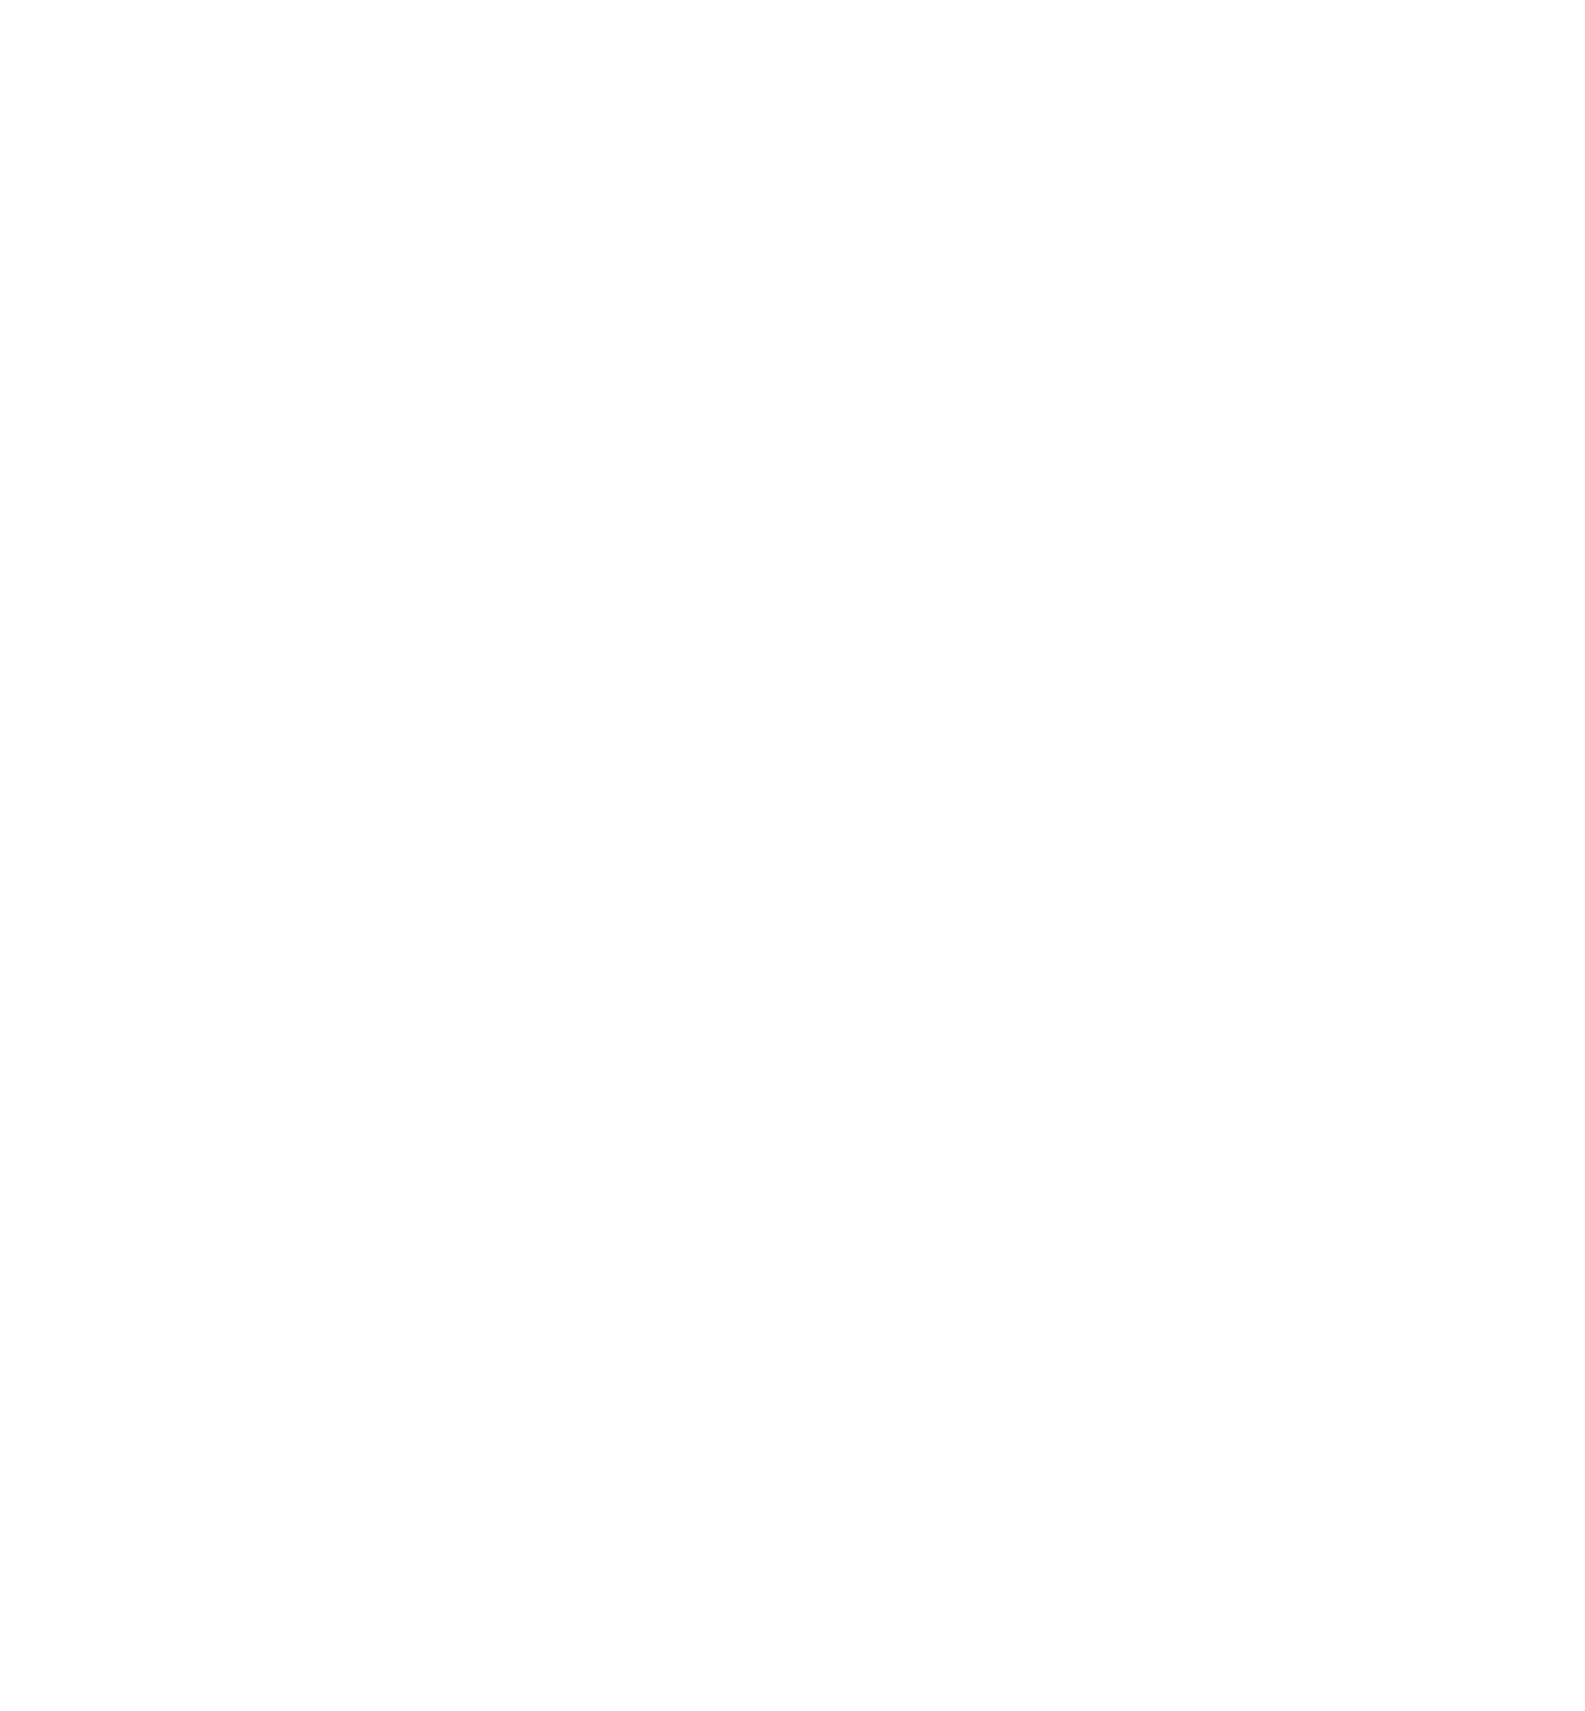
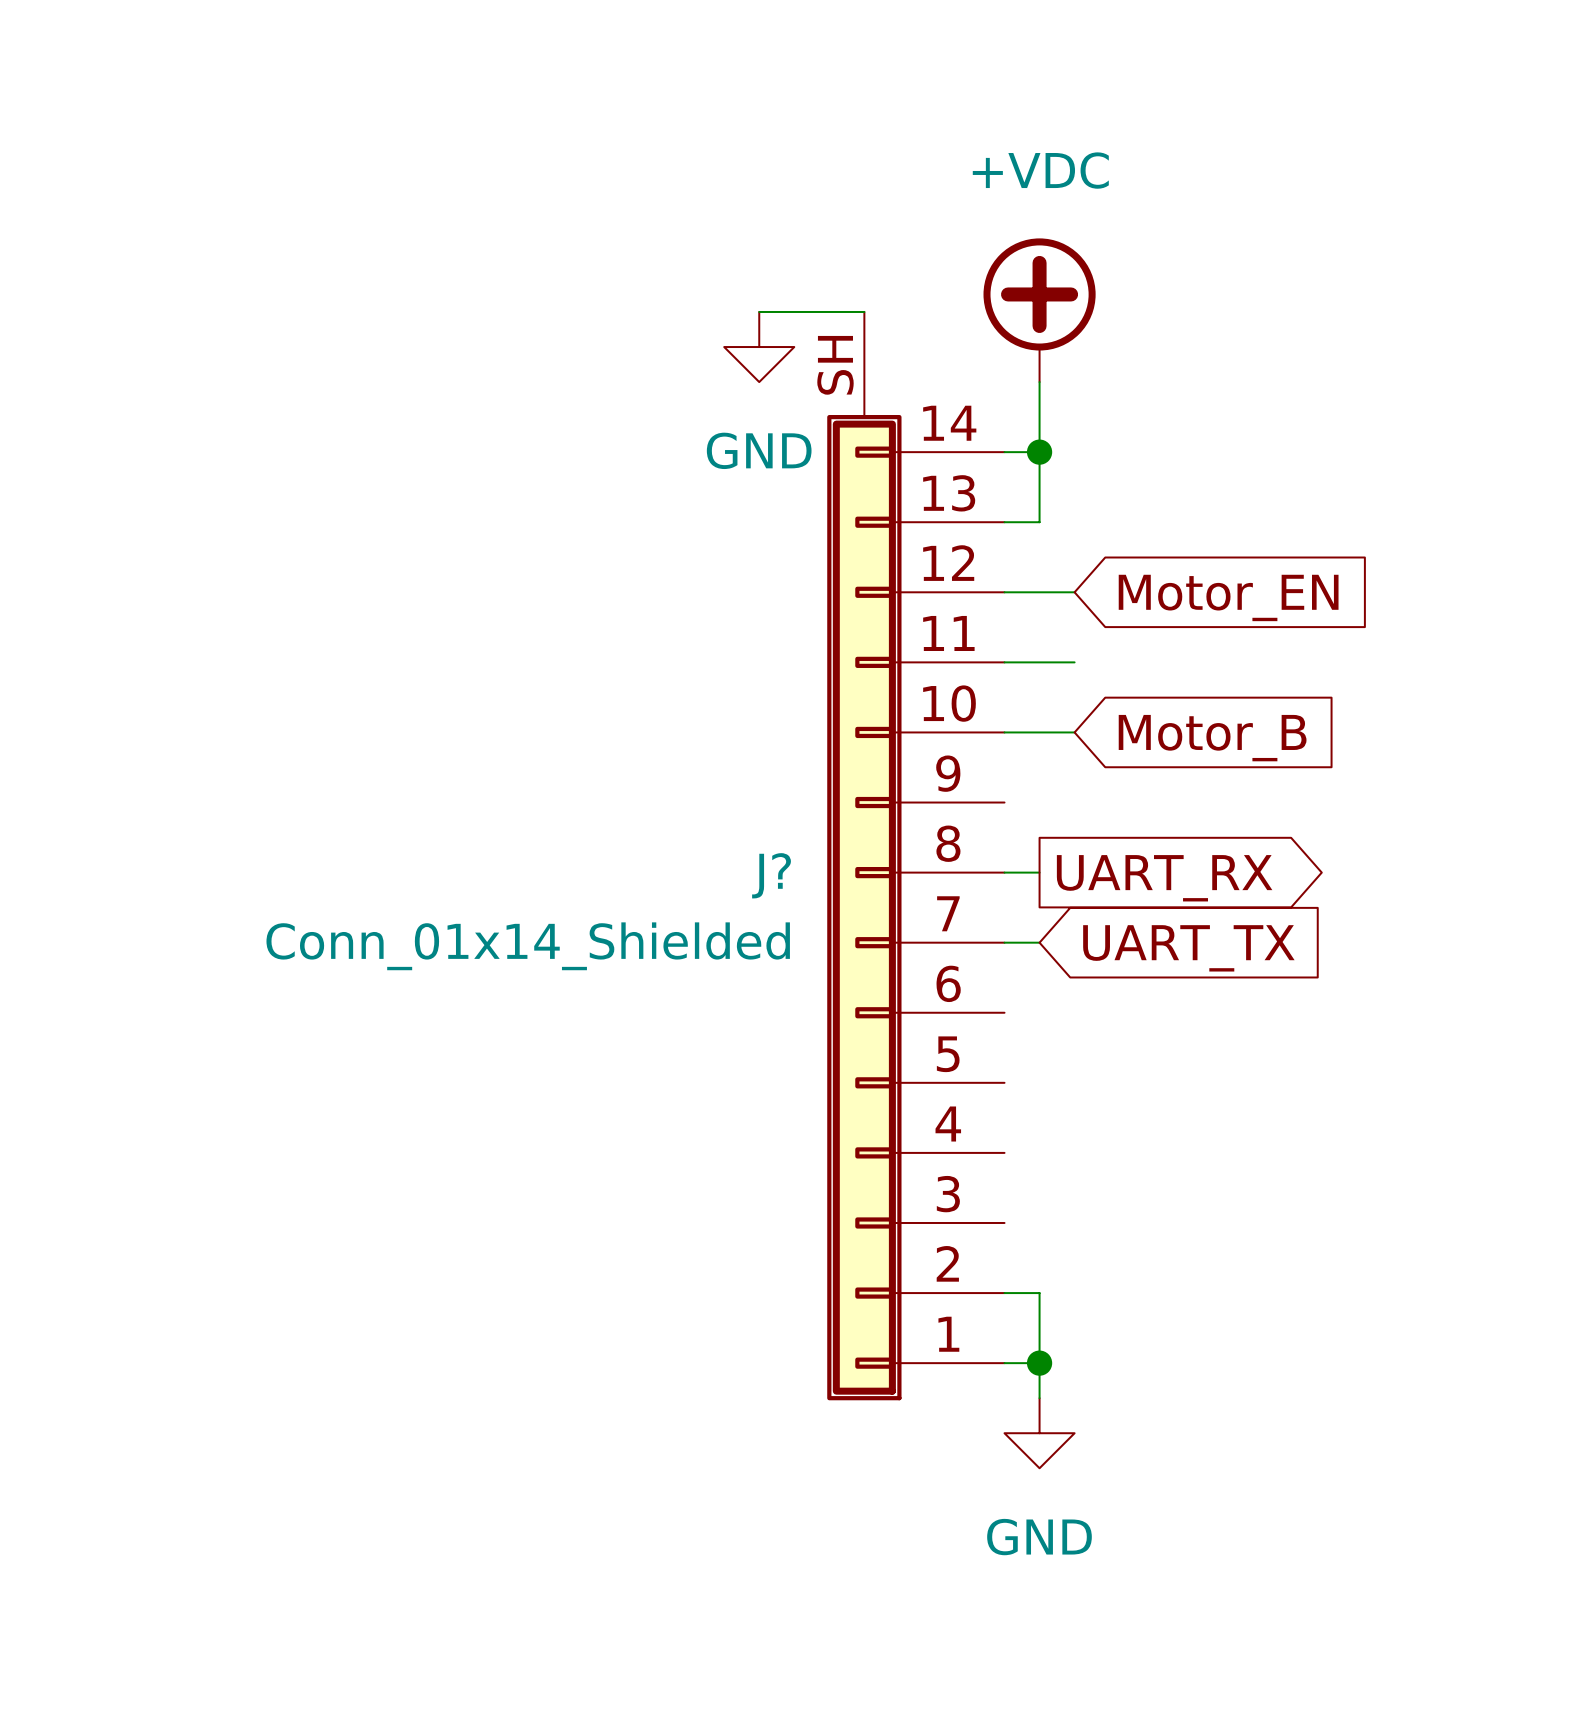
power symbol: none -> +VDC (1039, 310)
wire: none -> (759, 311) (864, 311)
power symbol: none -> GND (759, 347)
wire: none -> (1039, 382) (1039, 522) (1004, 522)
wire: none -> (1004, 452) (1039, 452)
junction: none -> (1039, 452)
wire: none -> (1004, 592) (1074, 592)
global label: none -> Motor_EN (1228, 597)
wire: none -> (1004, 662) (1074, 662)
wire: none -> (1004, 732) (1074, 732)
global label: none -> Motor_B (1212, 738)
J?: none -> Conn_01x14_Shielded (915, 856)
wire: none -> (1004, 872) (1039, 872)
global label: none -> UART_RX (1164, 878)
wire: none -> (1004, 942) (1039, 942)
global label: none -> UART_TX (1188, 948)
wire: none -> (1004, 1293) (1039, 1293) (1039, 1398)
wire: none -> (1004, 1363) (1039, 1363)
junction: none -> (1039, 1363)
power symbol: none -> GND (1039, 1433)

